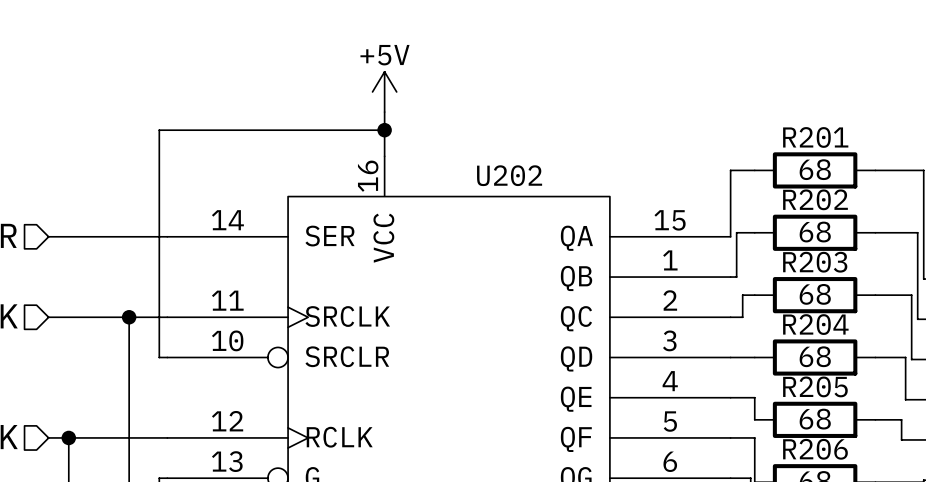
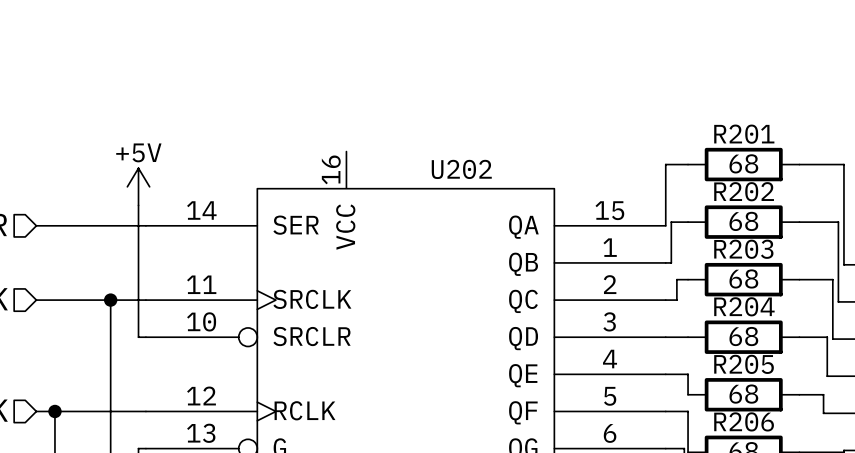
power symbol position: +5V (384, 91) -> +5V (138, 186)
wire: (384, 112) (384, 156) -> none
wire: (384, 130) (159, 130) (159, 214) -> none
junction: (384, 130) -> none

